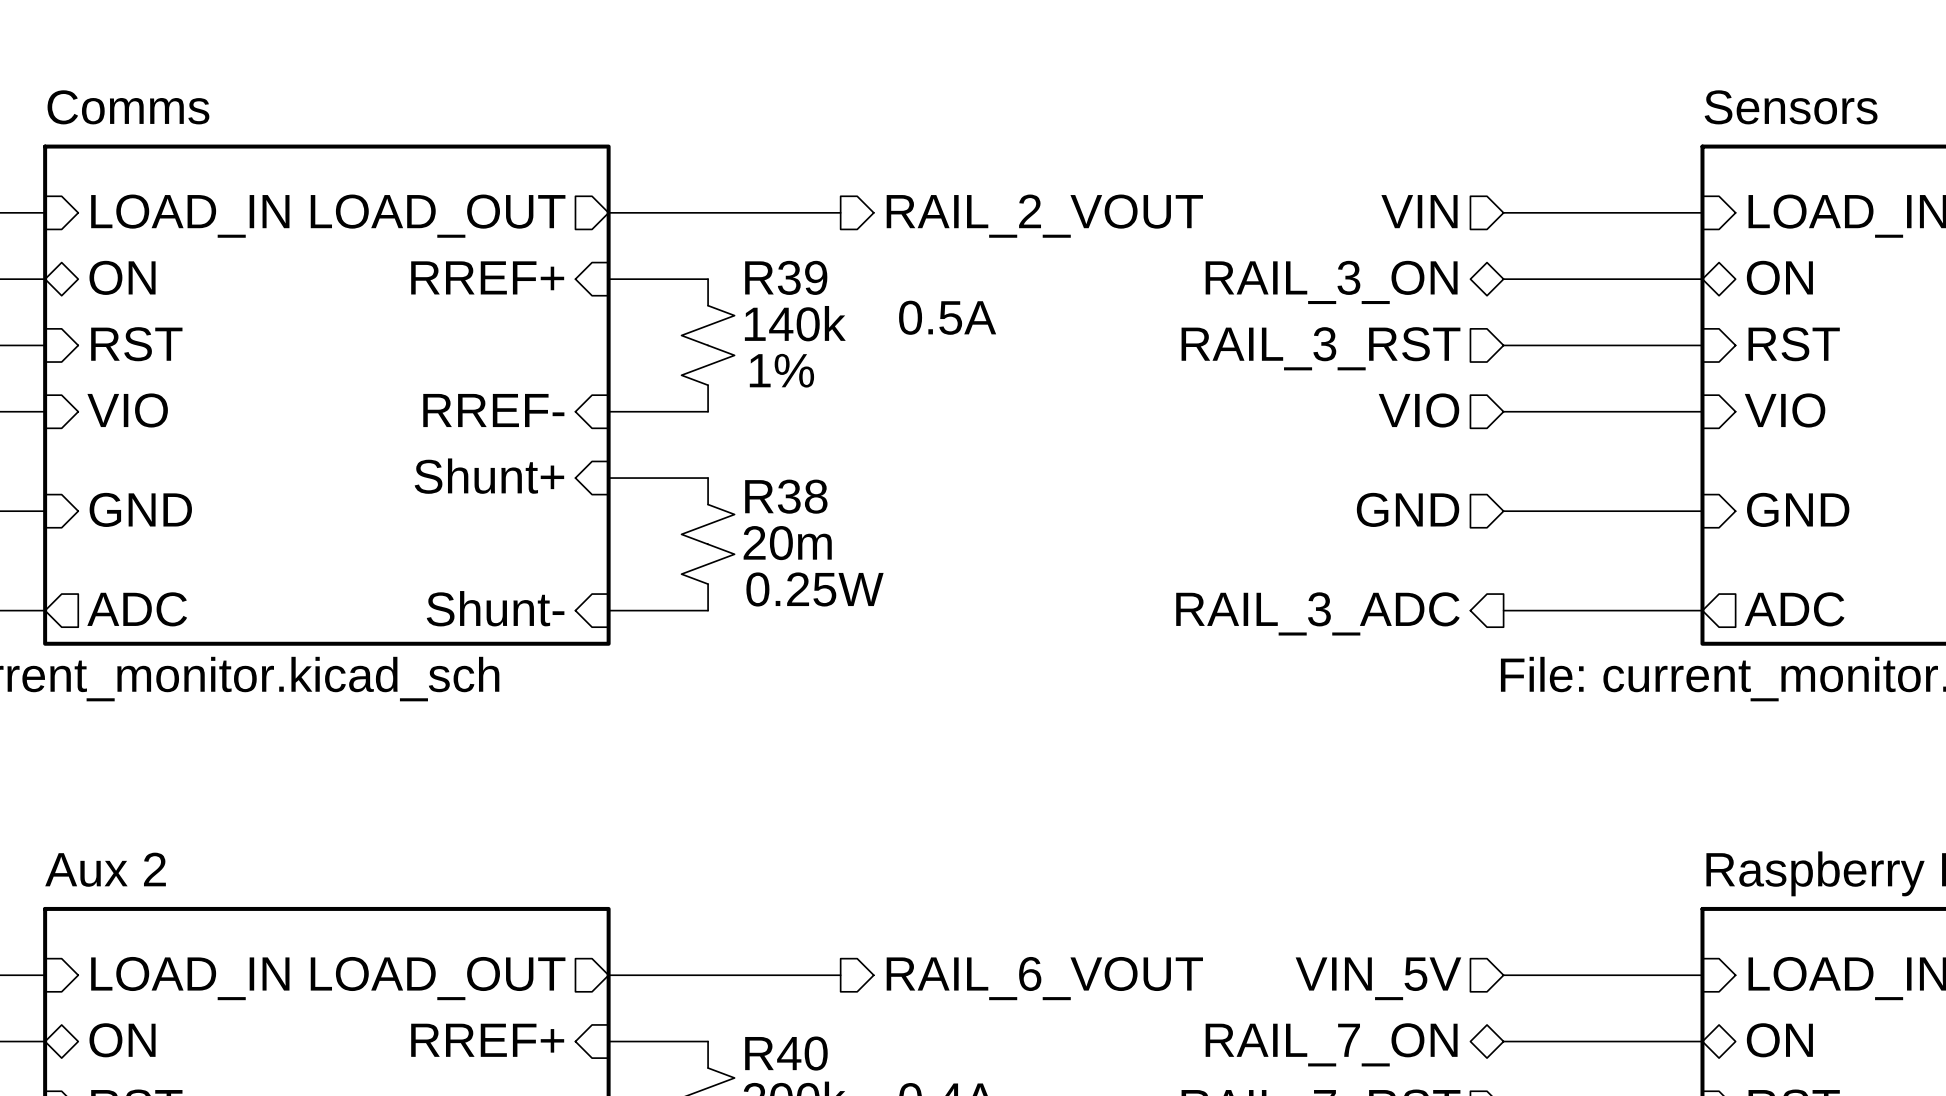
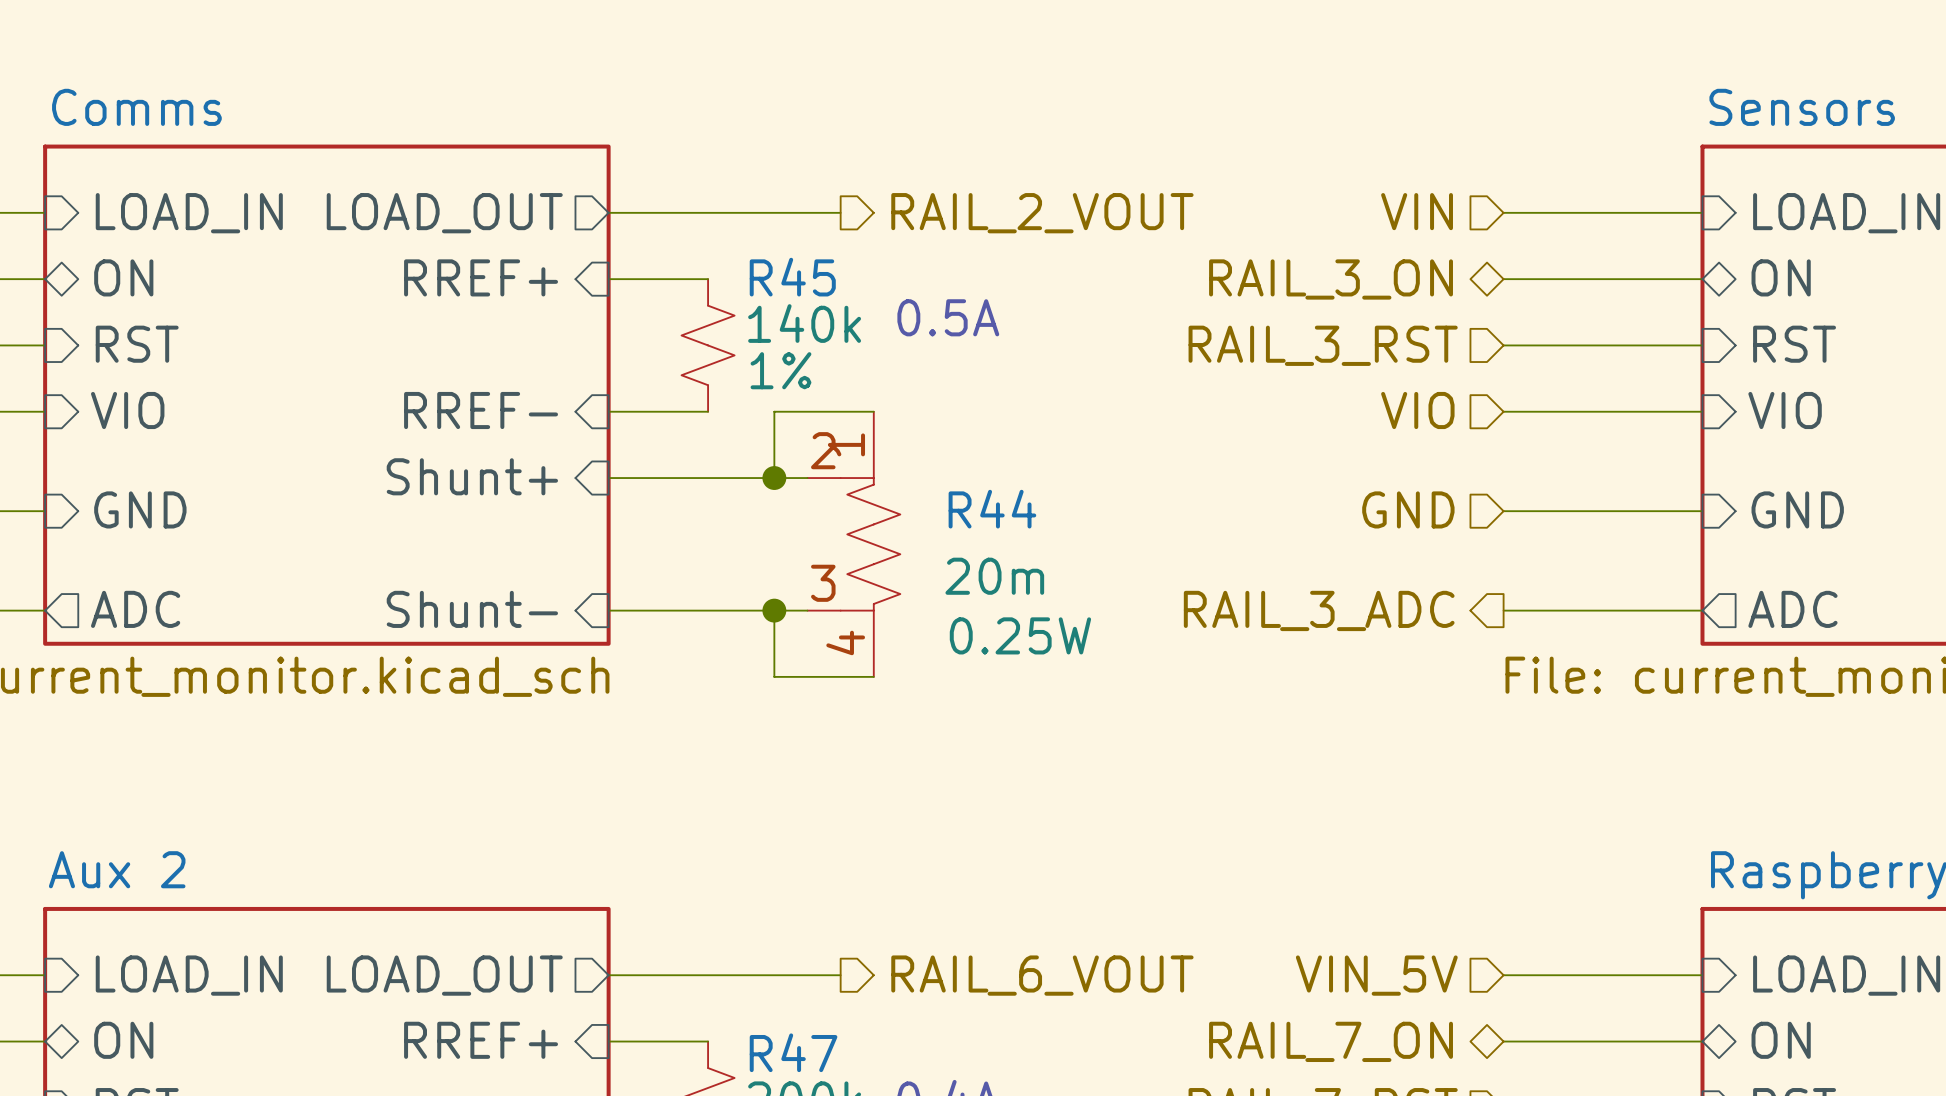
R39 name: R39 (786, 277) -> R45 (792, 277)
wire: none -> (873, 411) (774, 411) (774, 478)
wire: none -> (708, 478) (807, 478)
junction: none -> (774, 478)
R38: 20m (708, 544) -> none
R44: none -> 20m (853, 544)
wire: none -> (708, 610) (807, 610)
wire: none -> (774, 610) (774, 676) (873, 676)
junction: none -> (774, 610)
R40 name: R40 (786, 1053) -> R47 (793, 1052)

